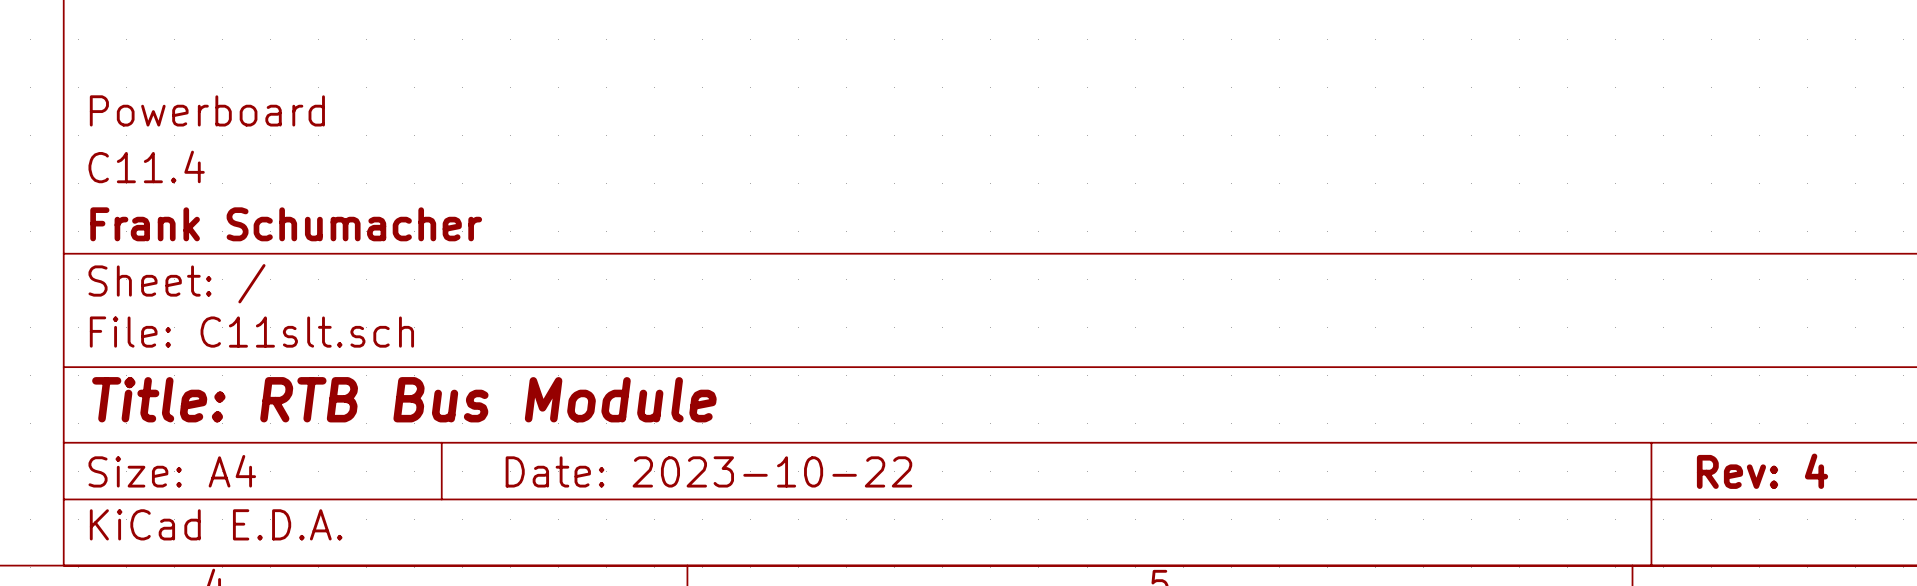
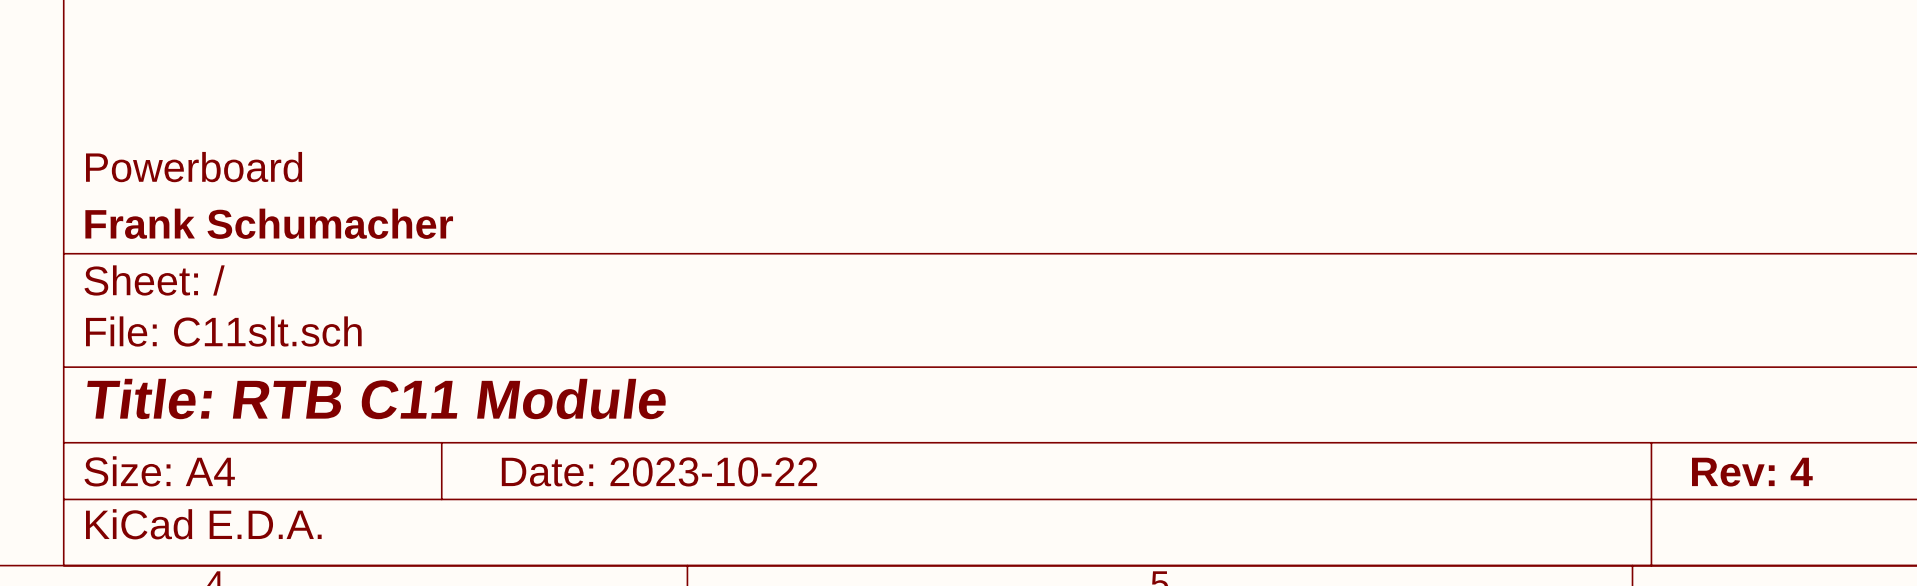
title block: Powerboard (207, 110) -> none
title block: C11.4 (146, 166) -> Powerboard (194, 167)
title block: Title: RTB Bus Module (404, 399) -> Title: RTB C11 Module (376, 399)

